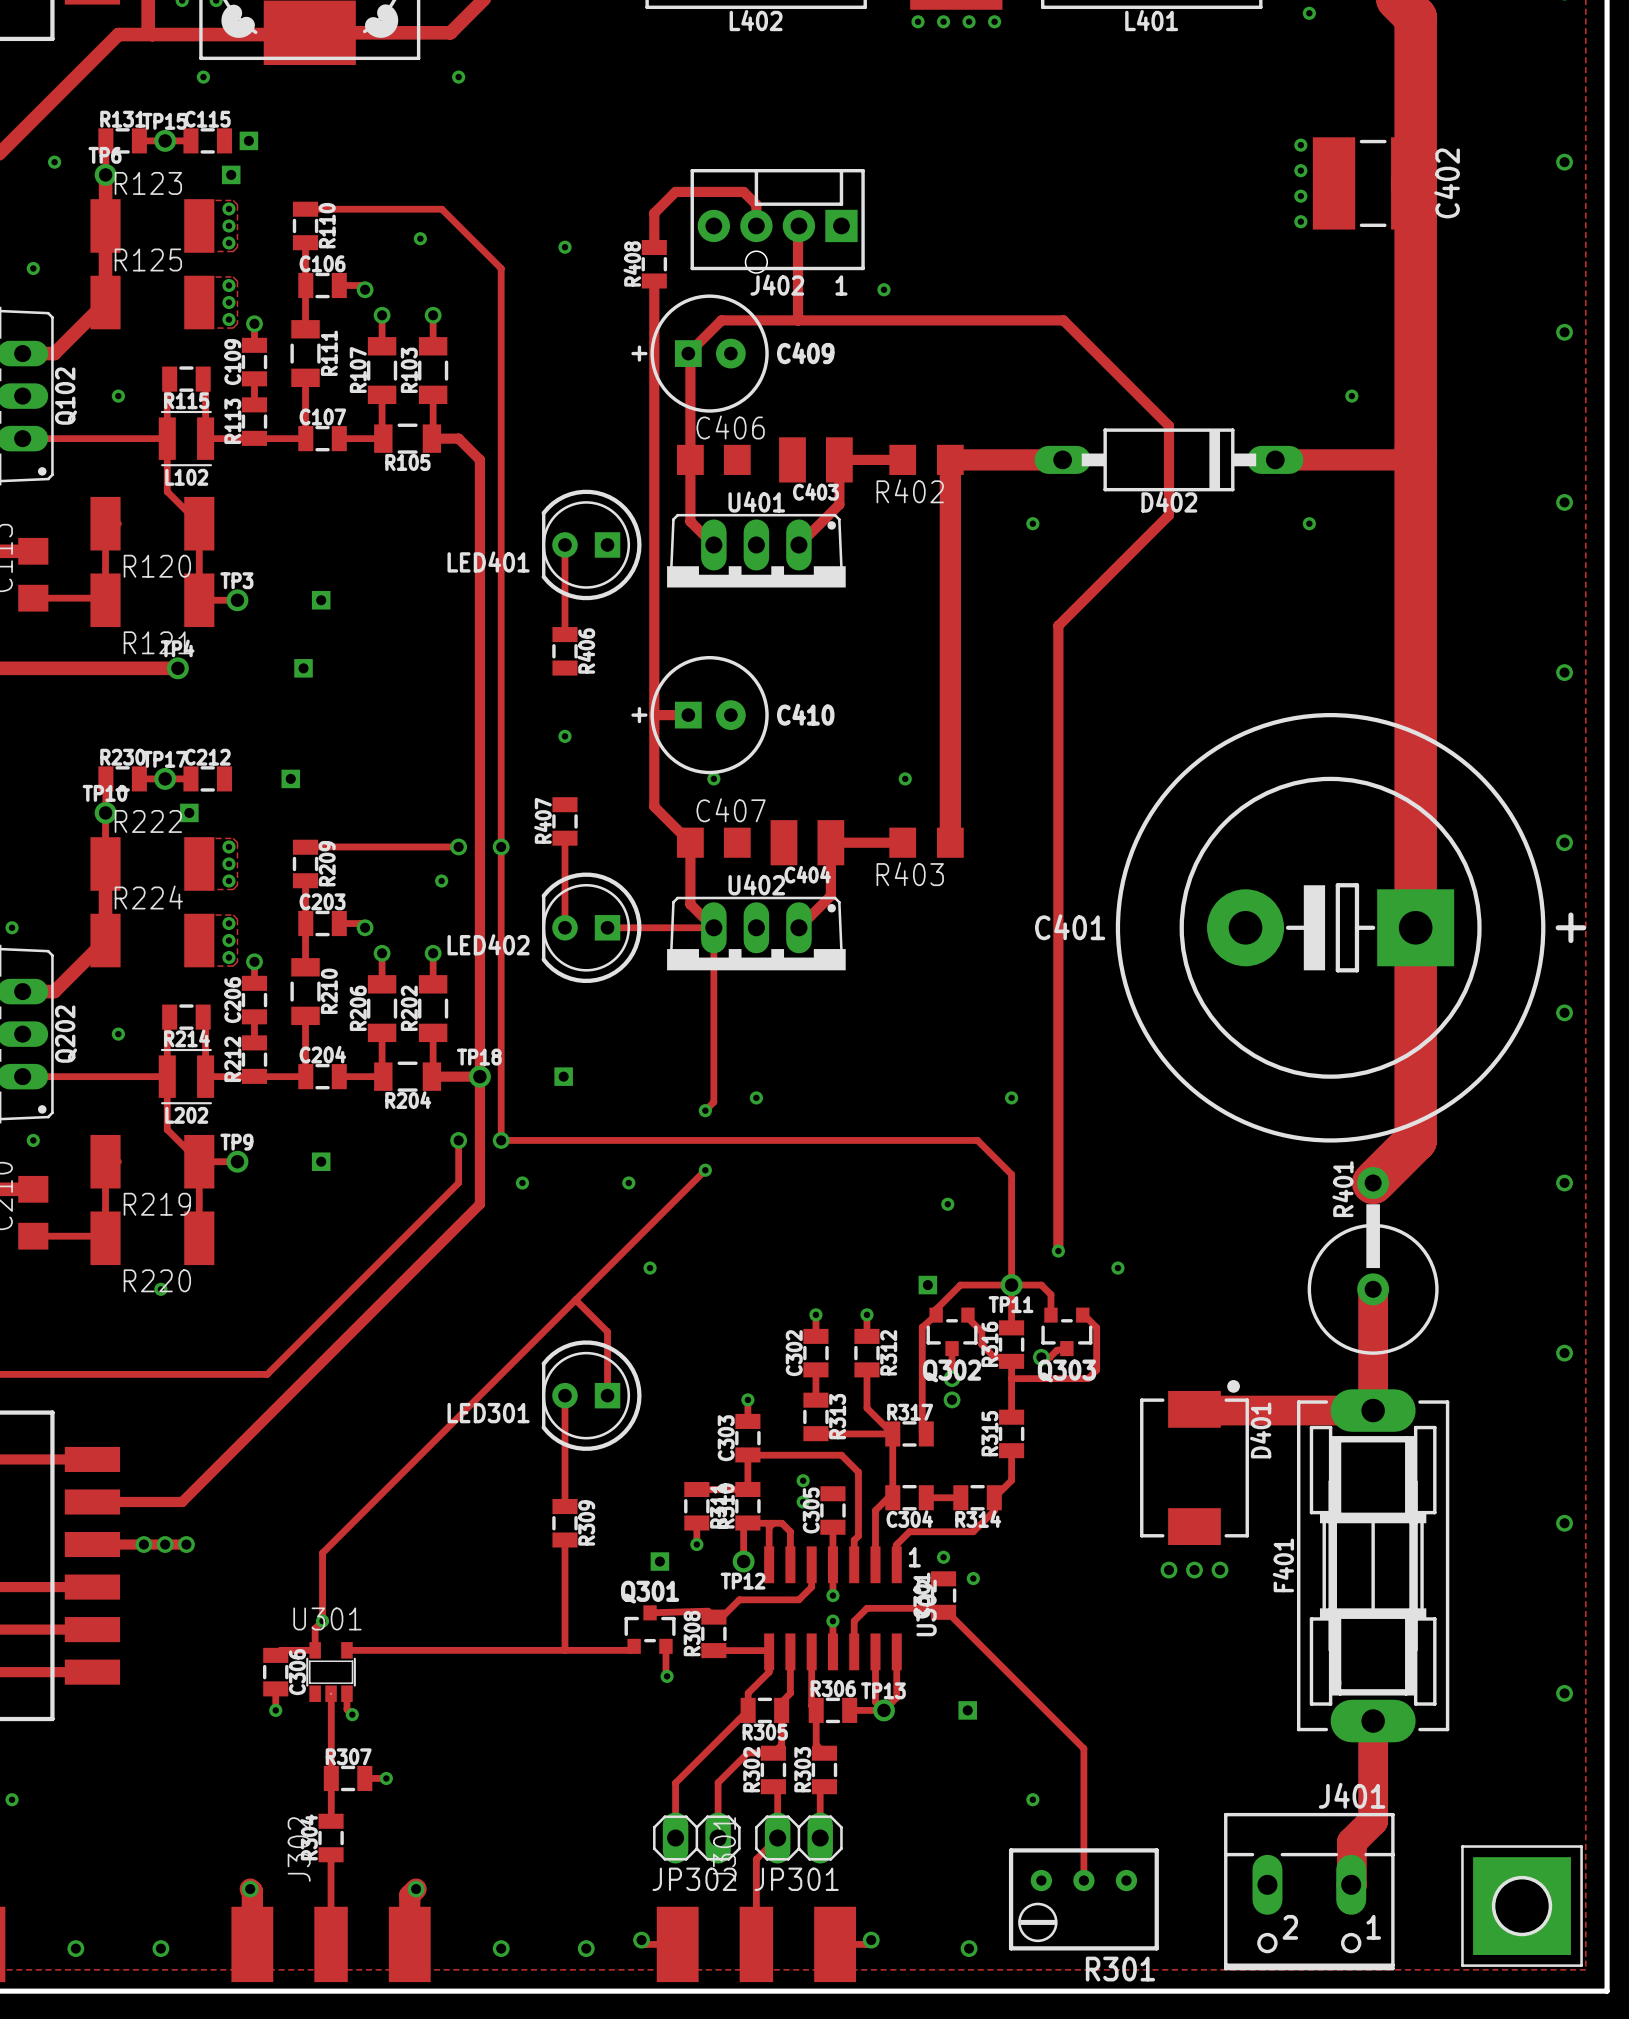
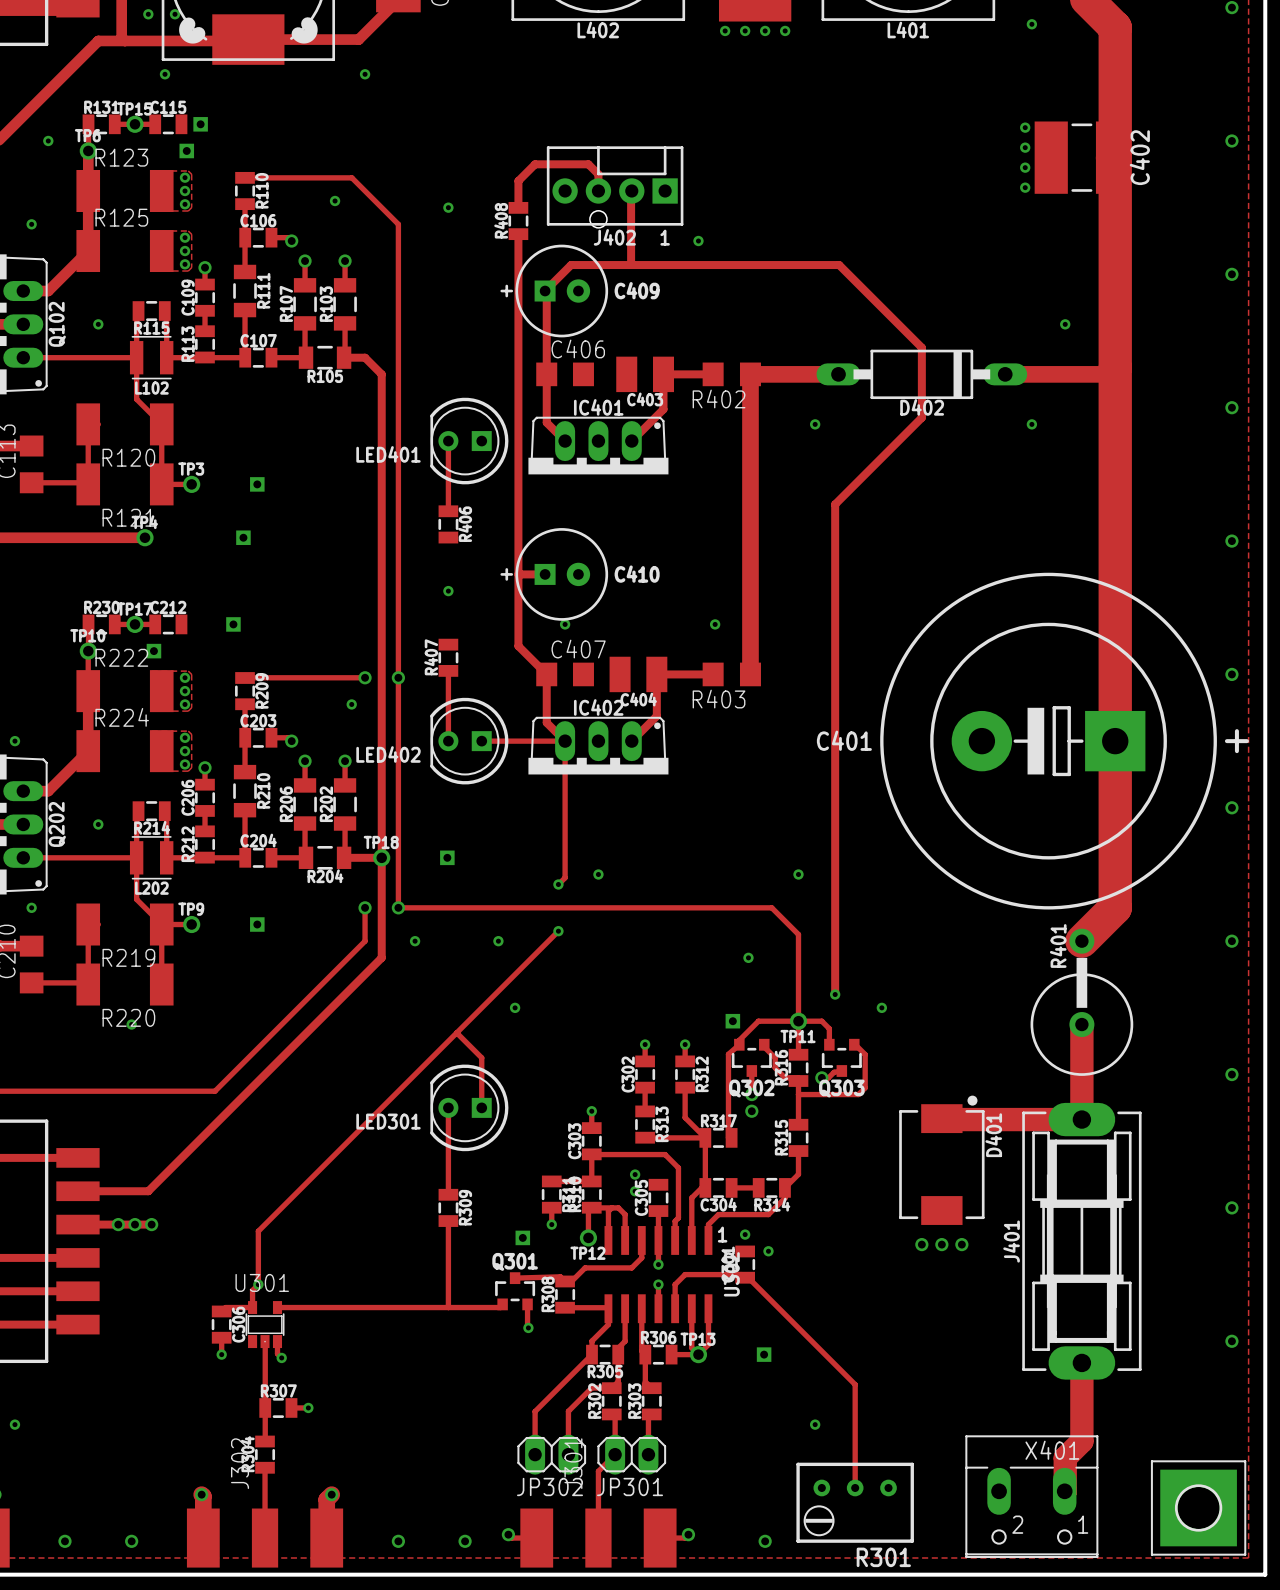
U401 name: U401 (756, 502) -> IC401 (598, 407)
U402 name: U402 (756, 884) -> IC402 (598, 707)
F401 name: F401 (1283, 1565) -> J401 (1011, 1241)
J401: (1309, 1891) -> none
X401: none -> (1031, 1496)

